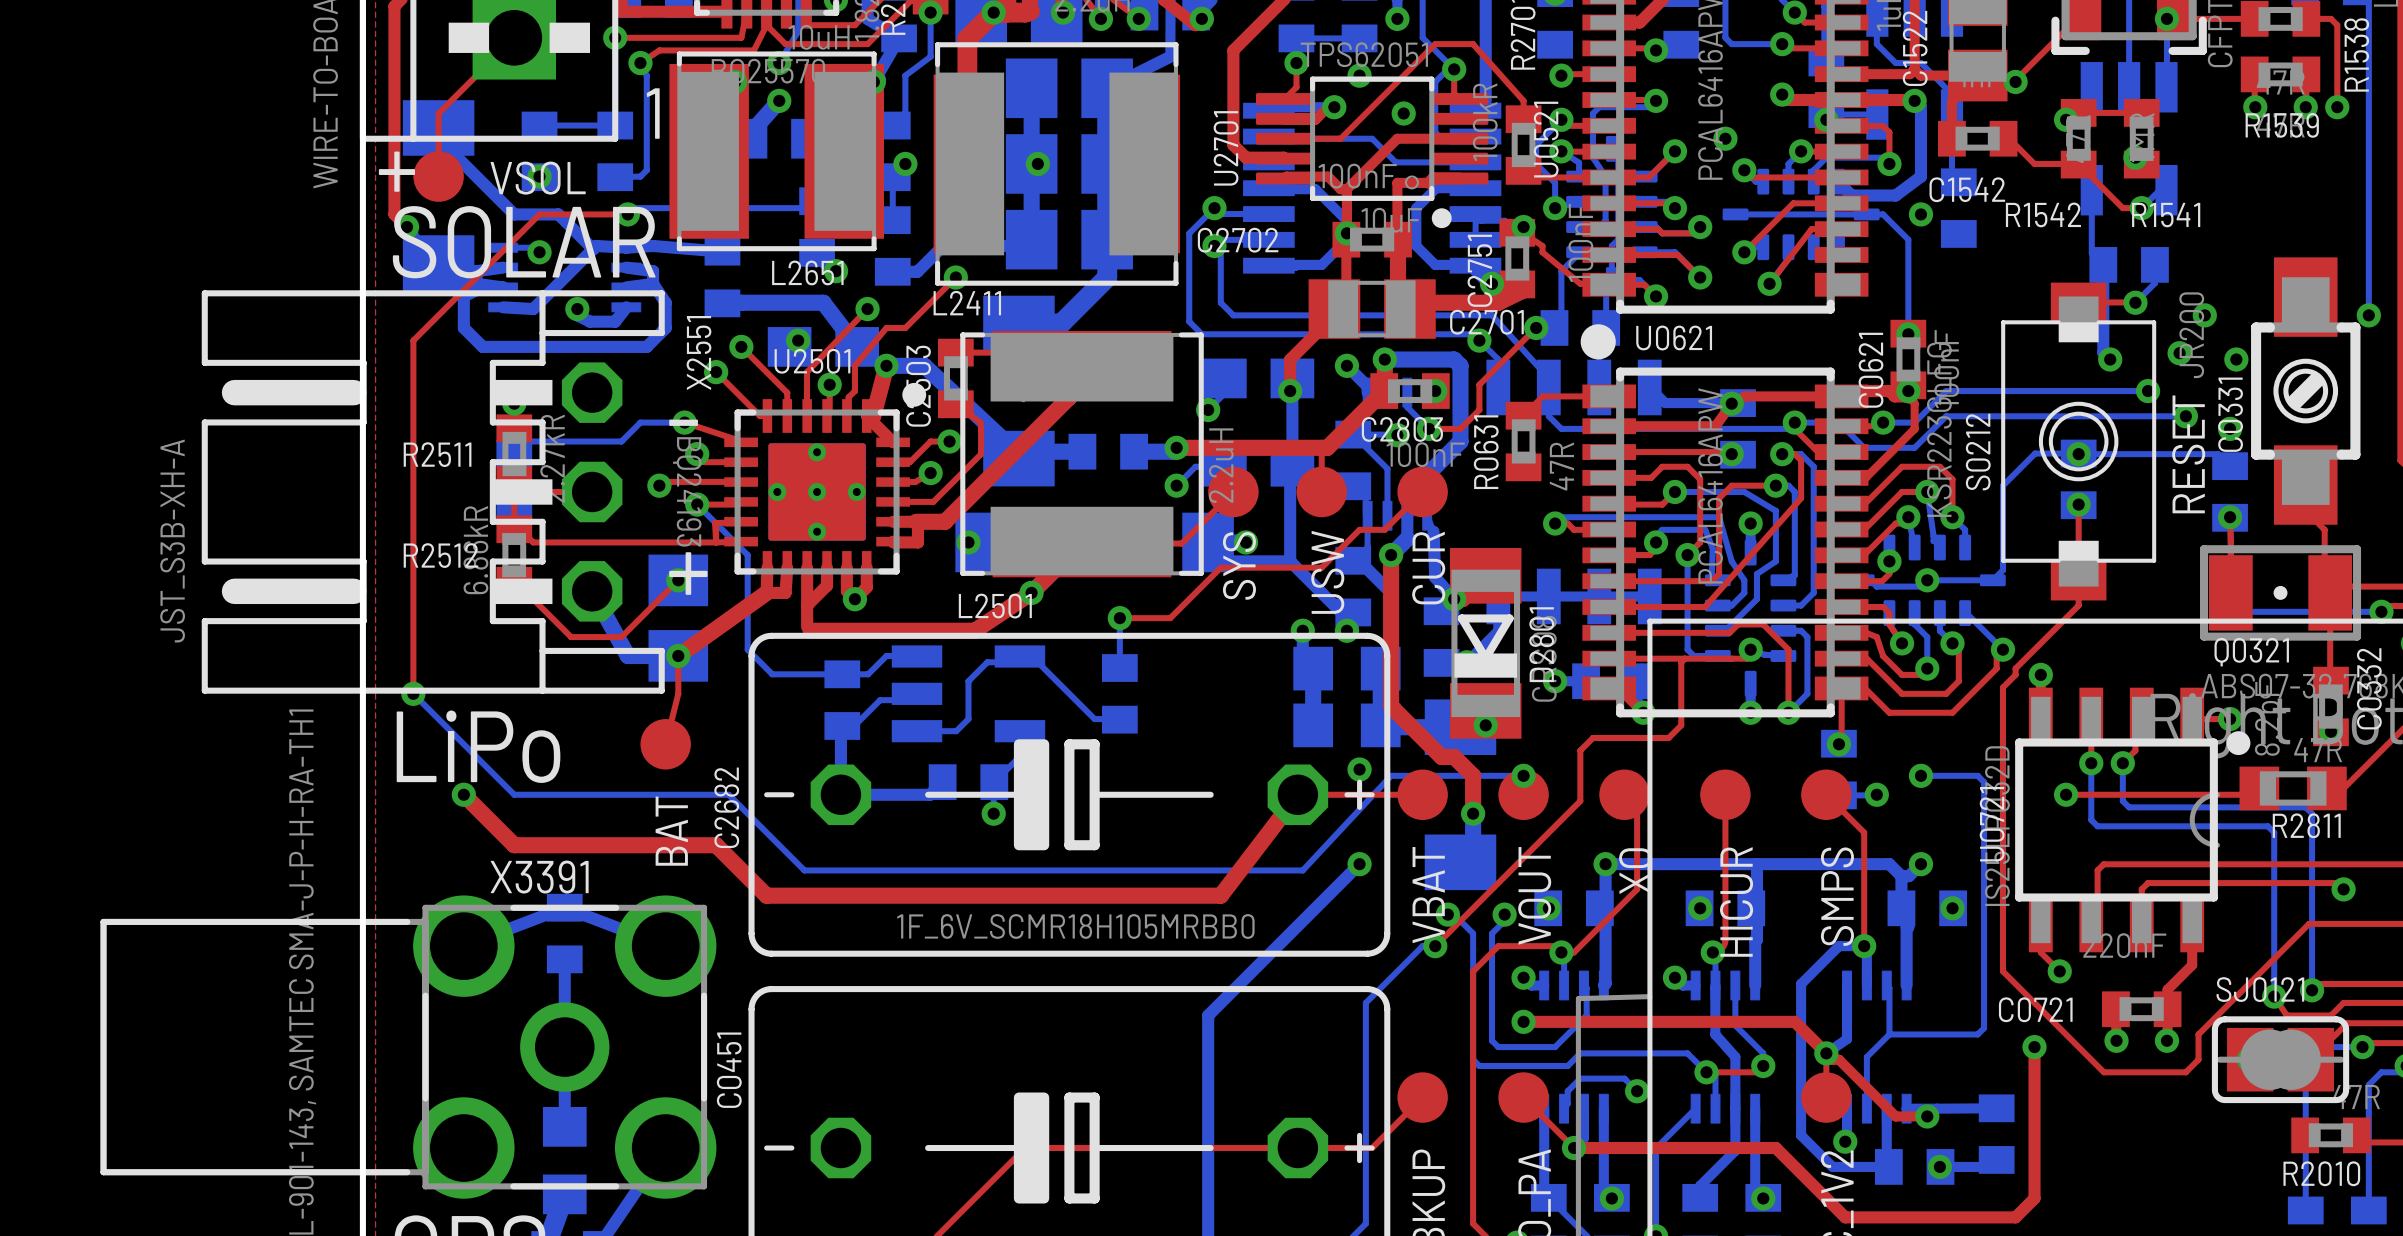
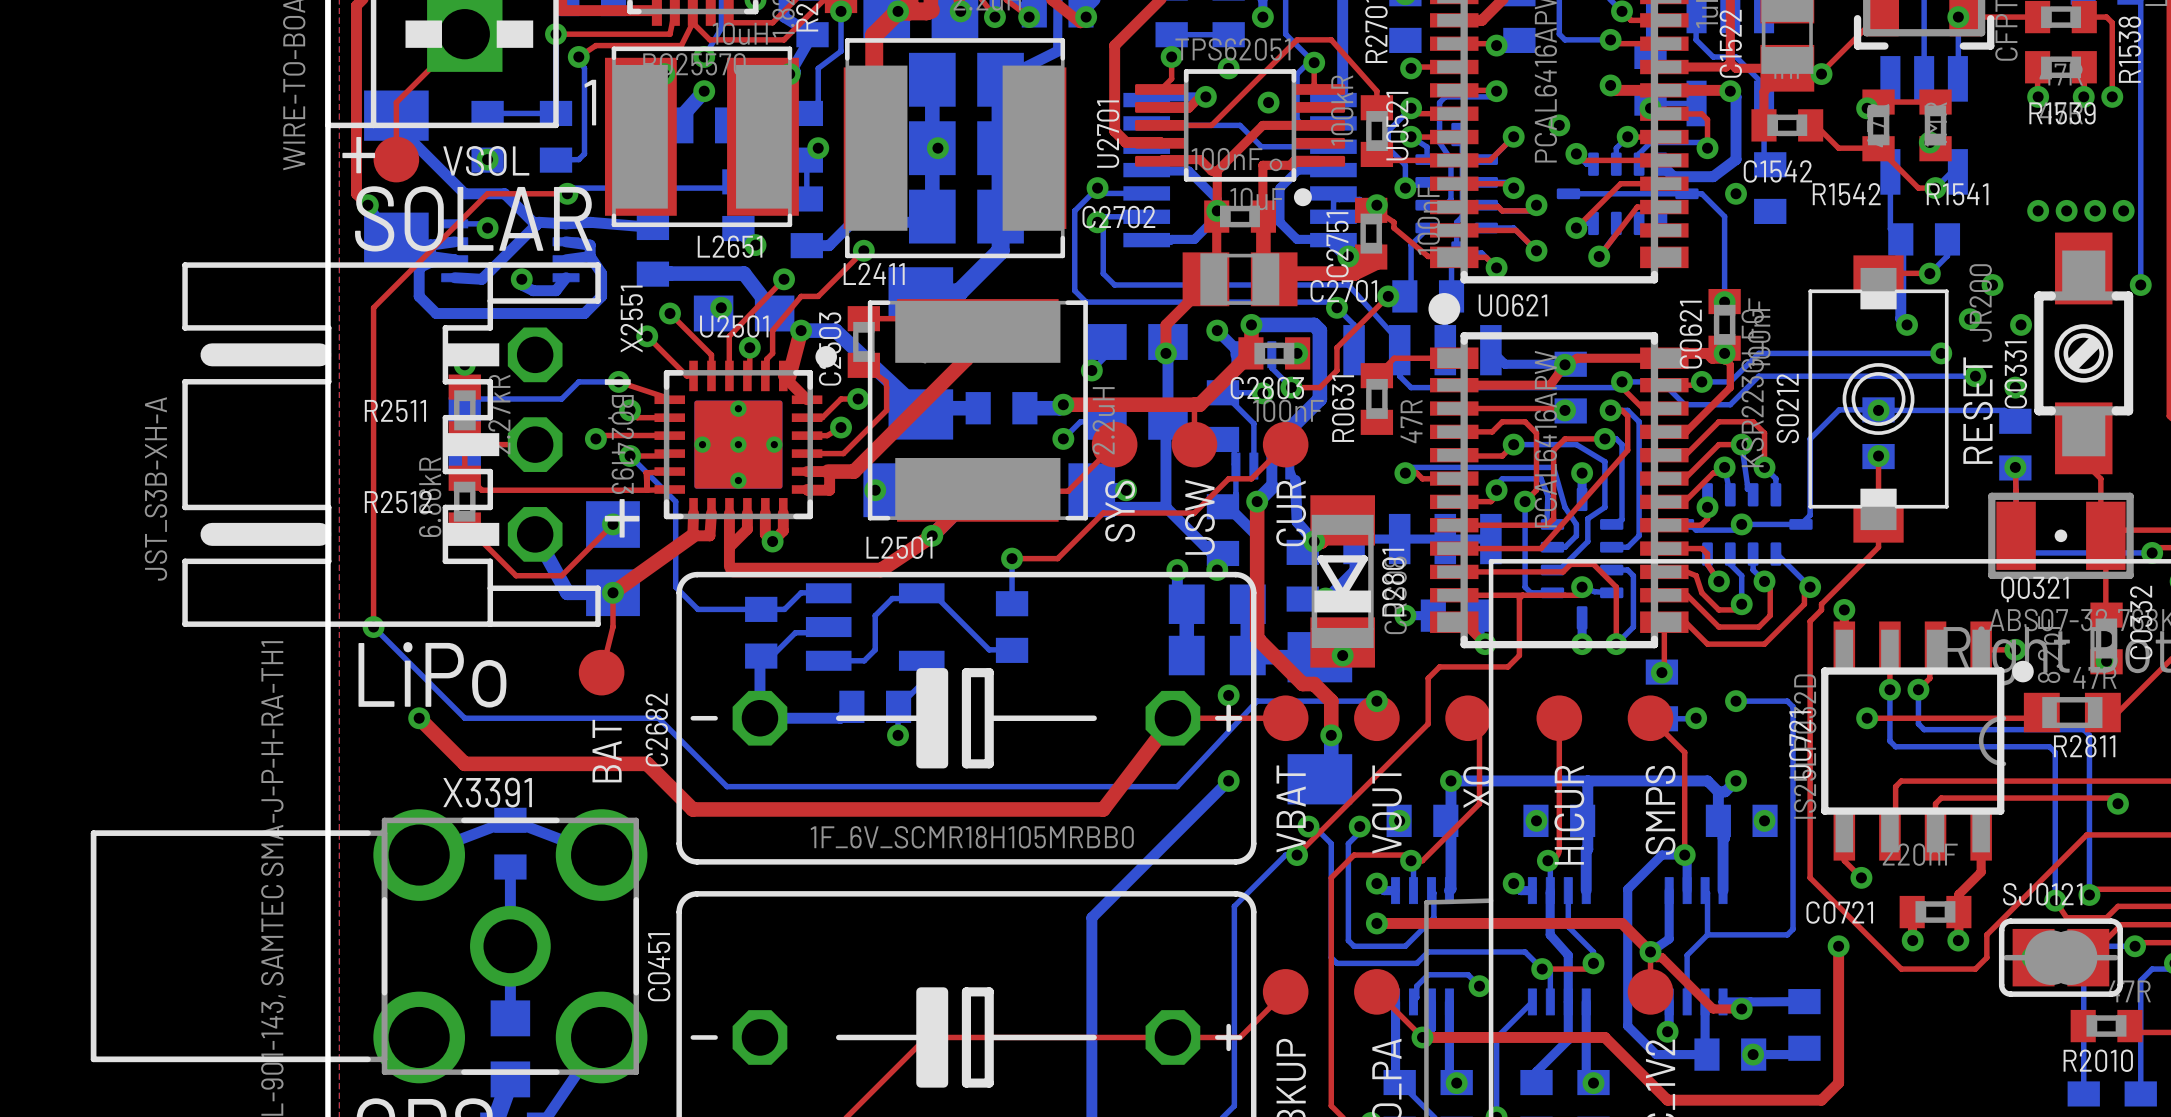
via: none -> (2038, 210)
via: none -> (2066, 210)
via: none -> (2095, 210)
via: none -> (2123, 210)

